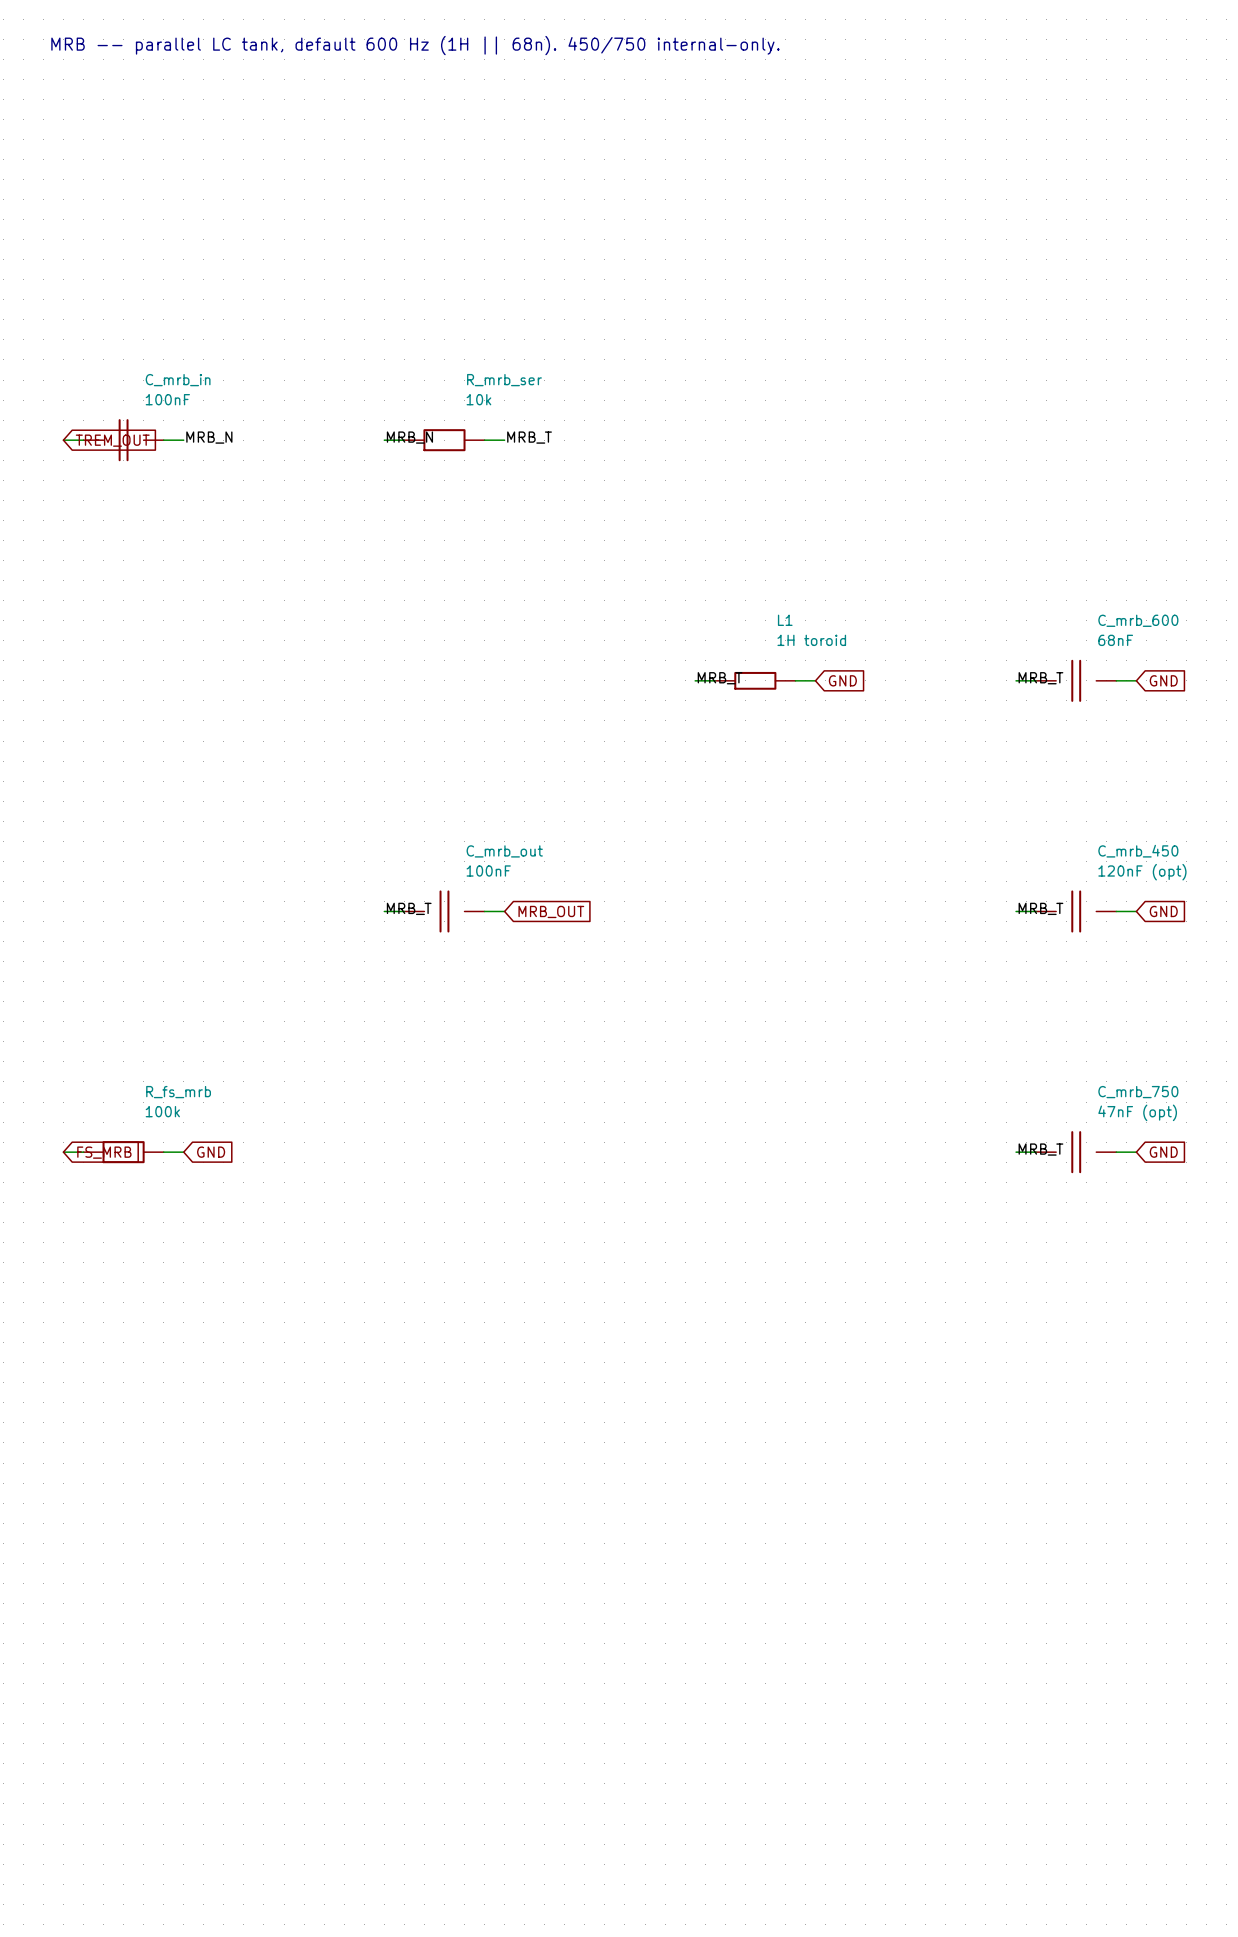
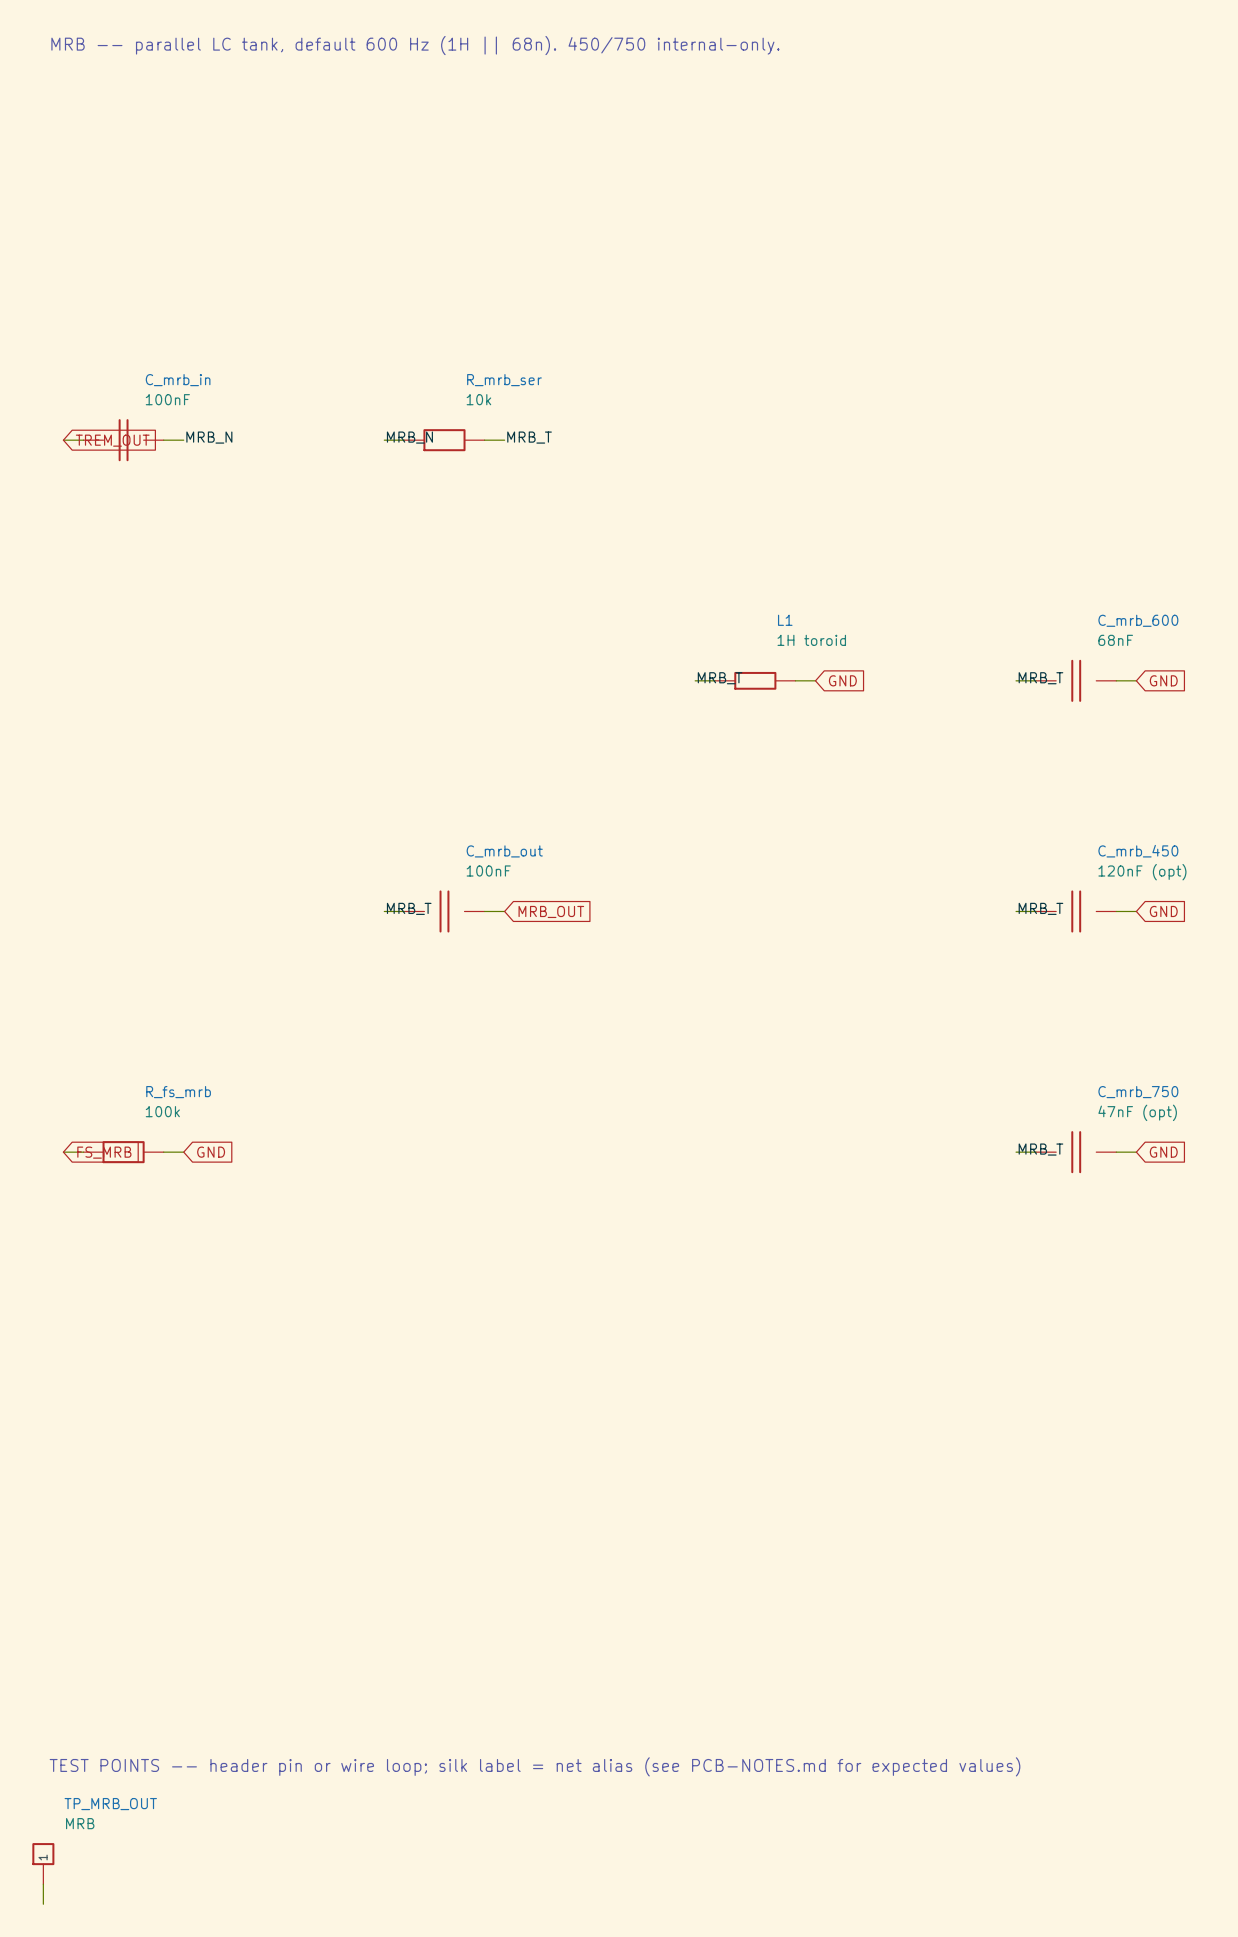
text: none -> TEST POINTS -- header pin or wire loop; silk label = net alias (see PCB-NOTES.md for expected values) (535, 1766)
TP_MRB_OUT: none -> MRB (43, 1863)
wire: none -> (43, 1884) (43, 1904)

